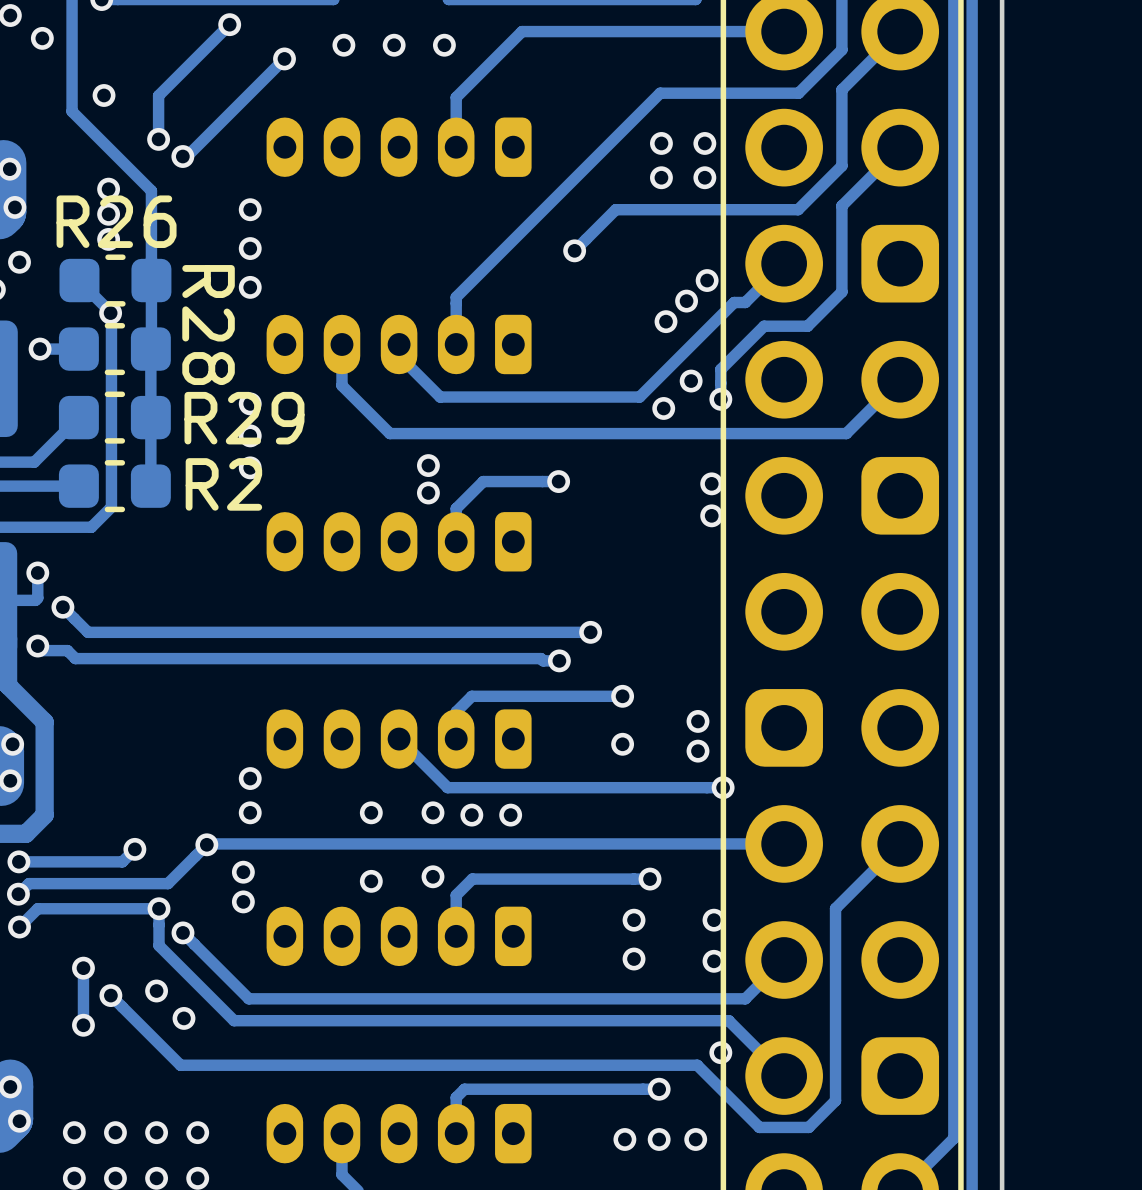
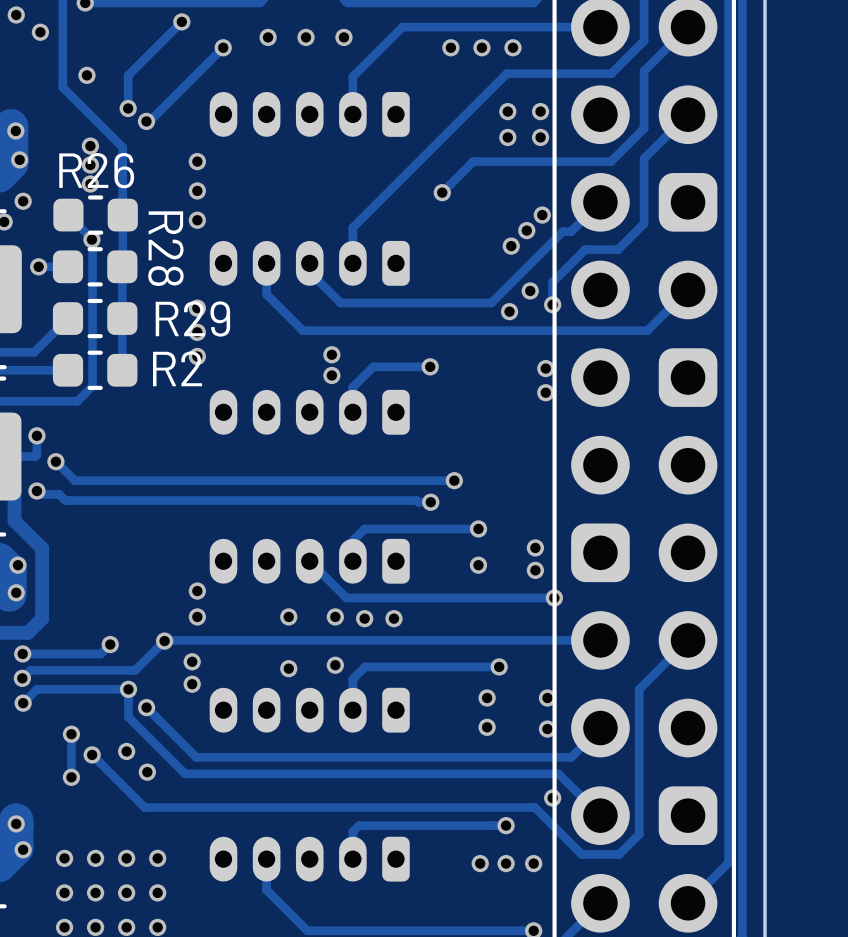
via: none -> (450, 47)
via: none -> (481, 47)
via: none -> (512, 47)

